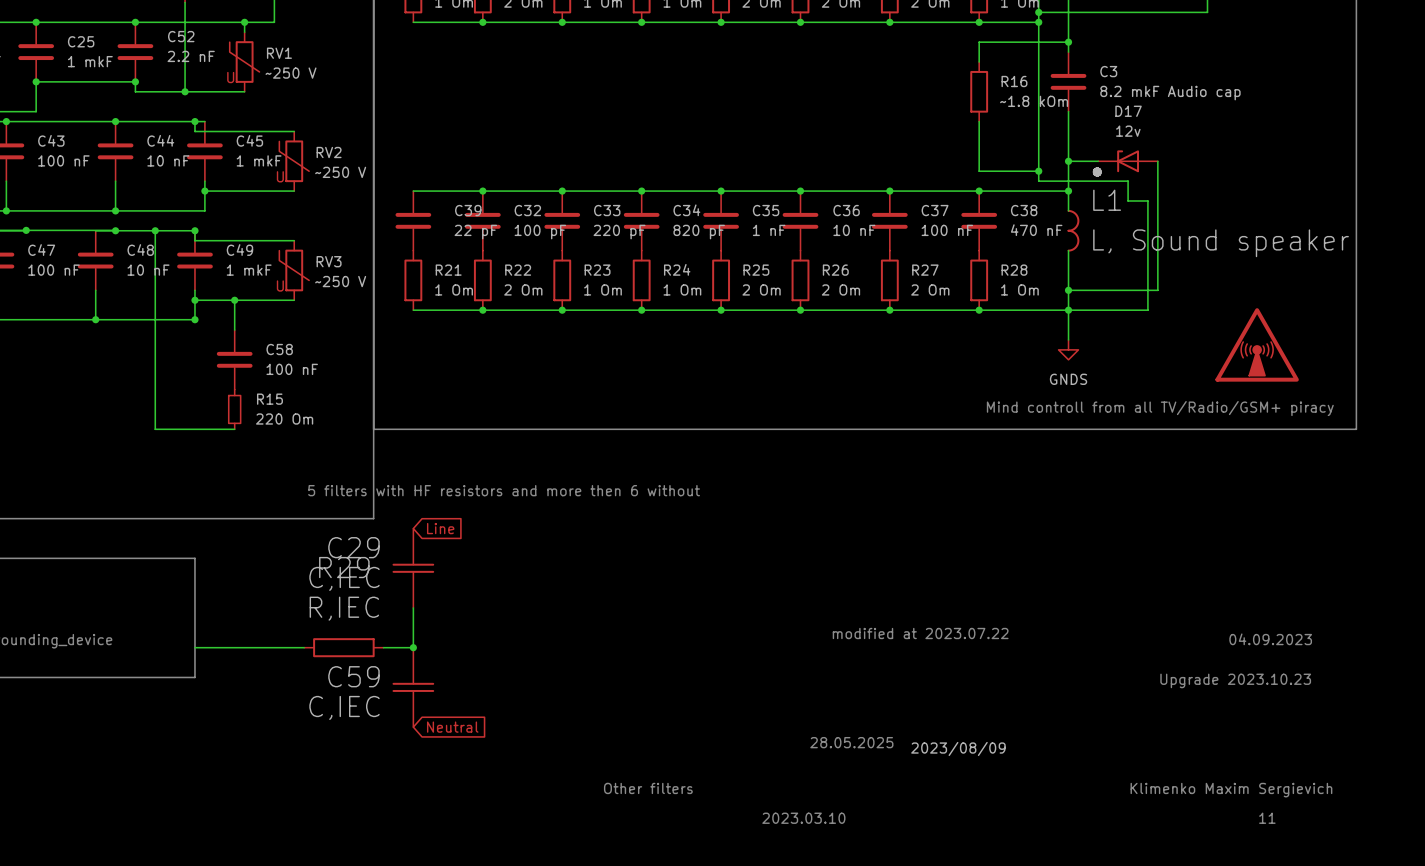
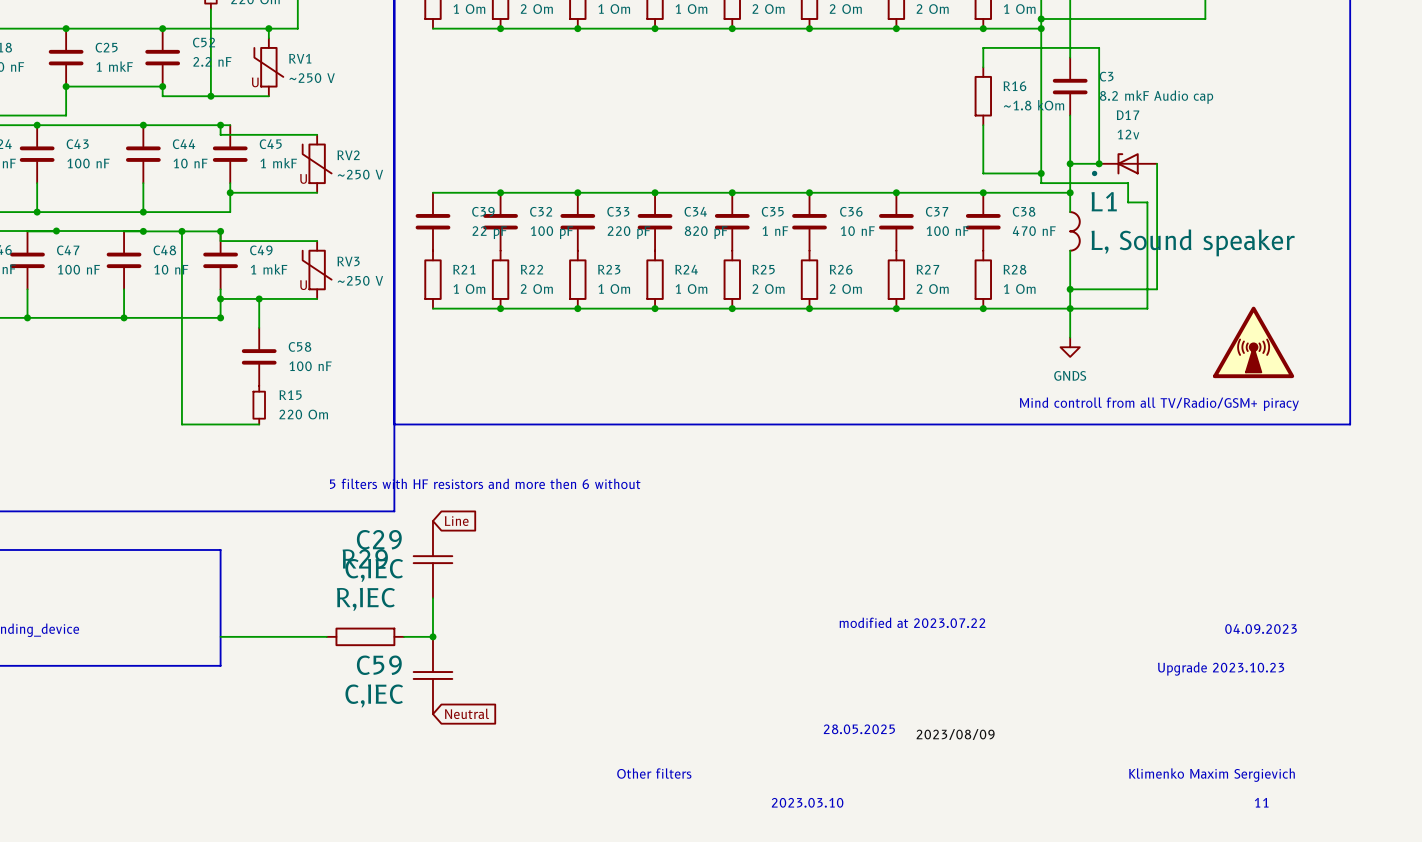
wire: none -> (1070, 47) (1099, 47) (1099, 163)
junction: (1068, 42) -> none
junction: none -> (1099, 163)

